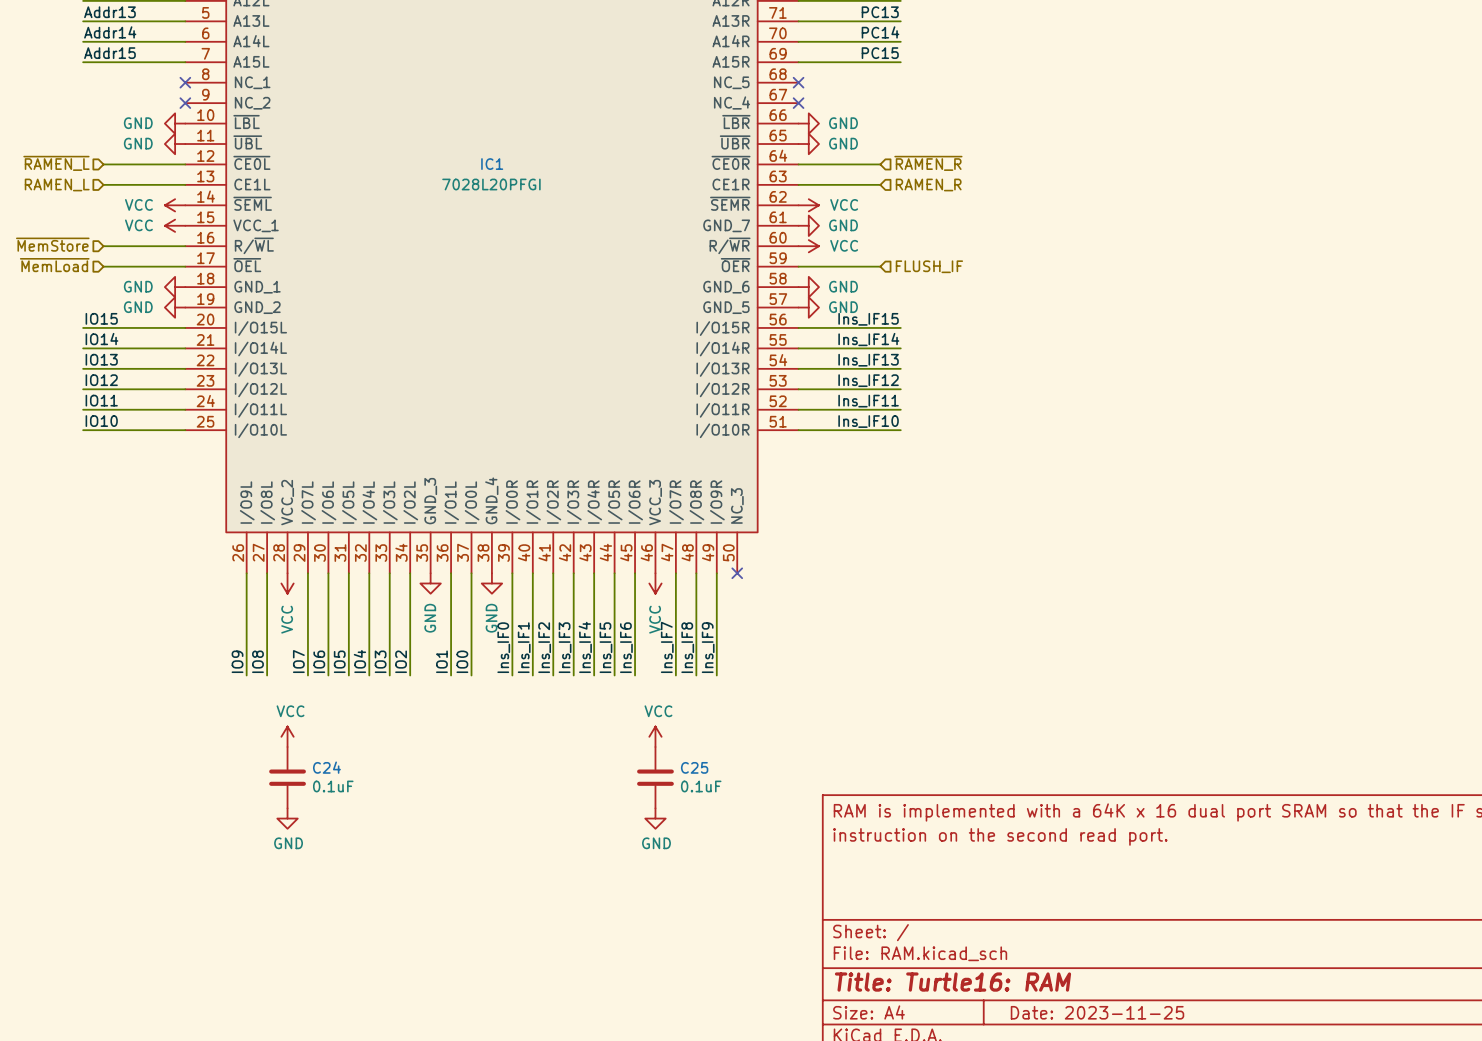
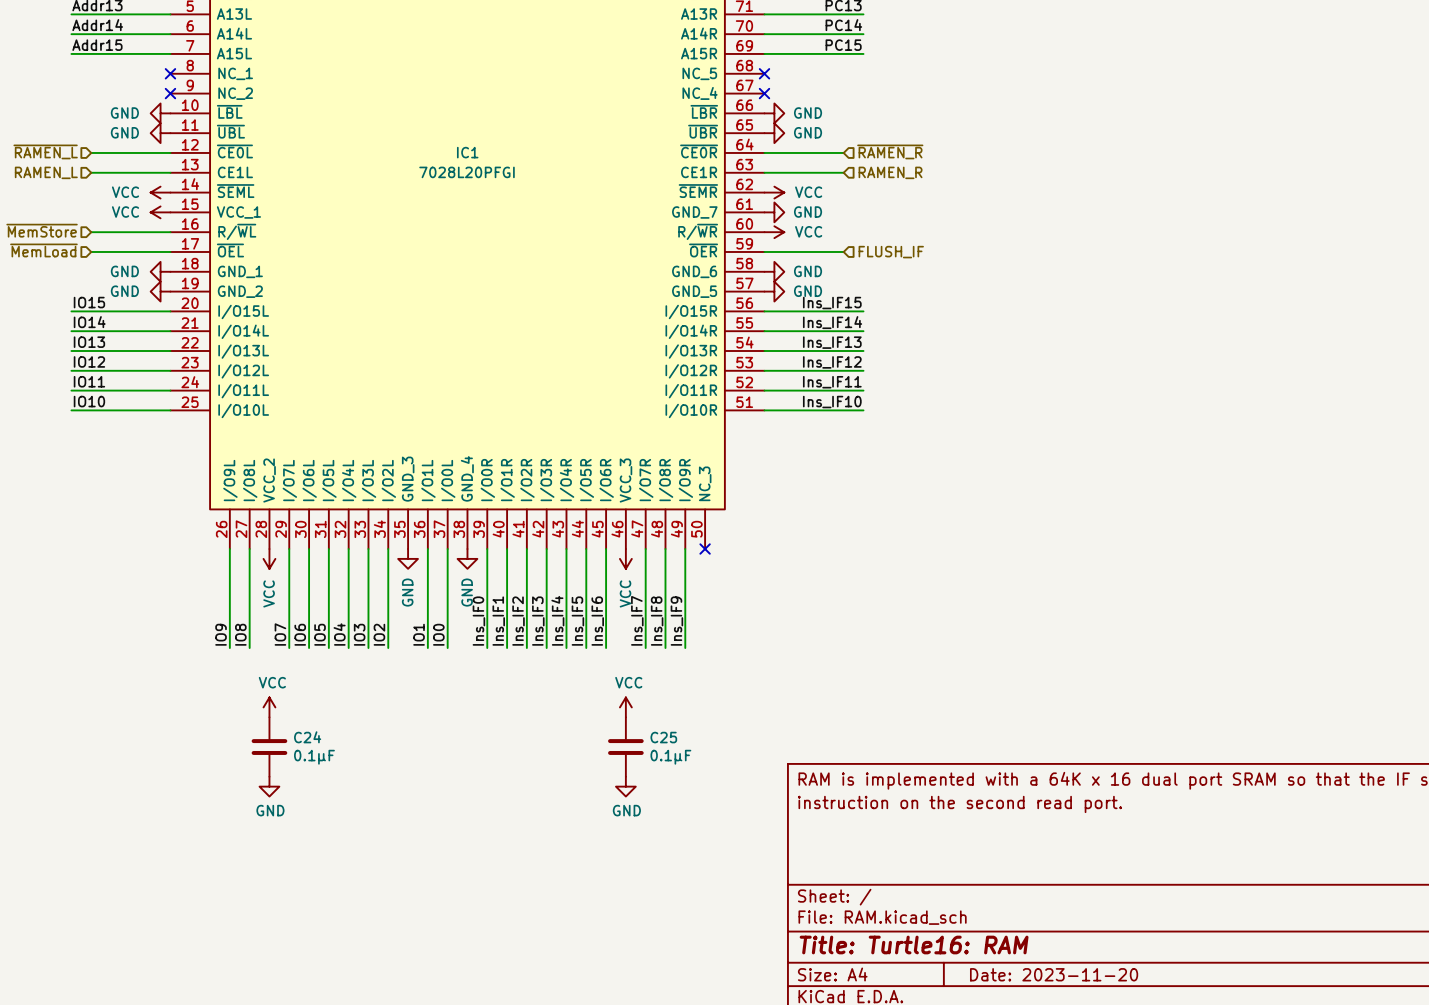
C24 value: 0.1uF (333, 786) -> 0.1μF (314, 757)
C25 value: 0.1uF (701, 786) -> 0.1μF (670, 757)
title block: Date: 2023-11-25 (1097, 1012) -> Date: 2023-11-20 (1054, 974)

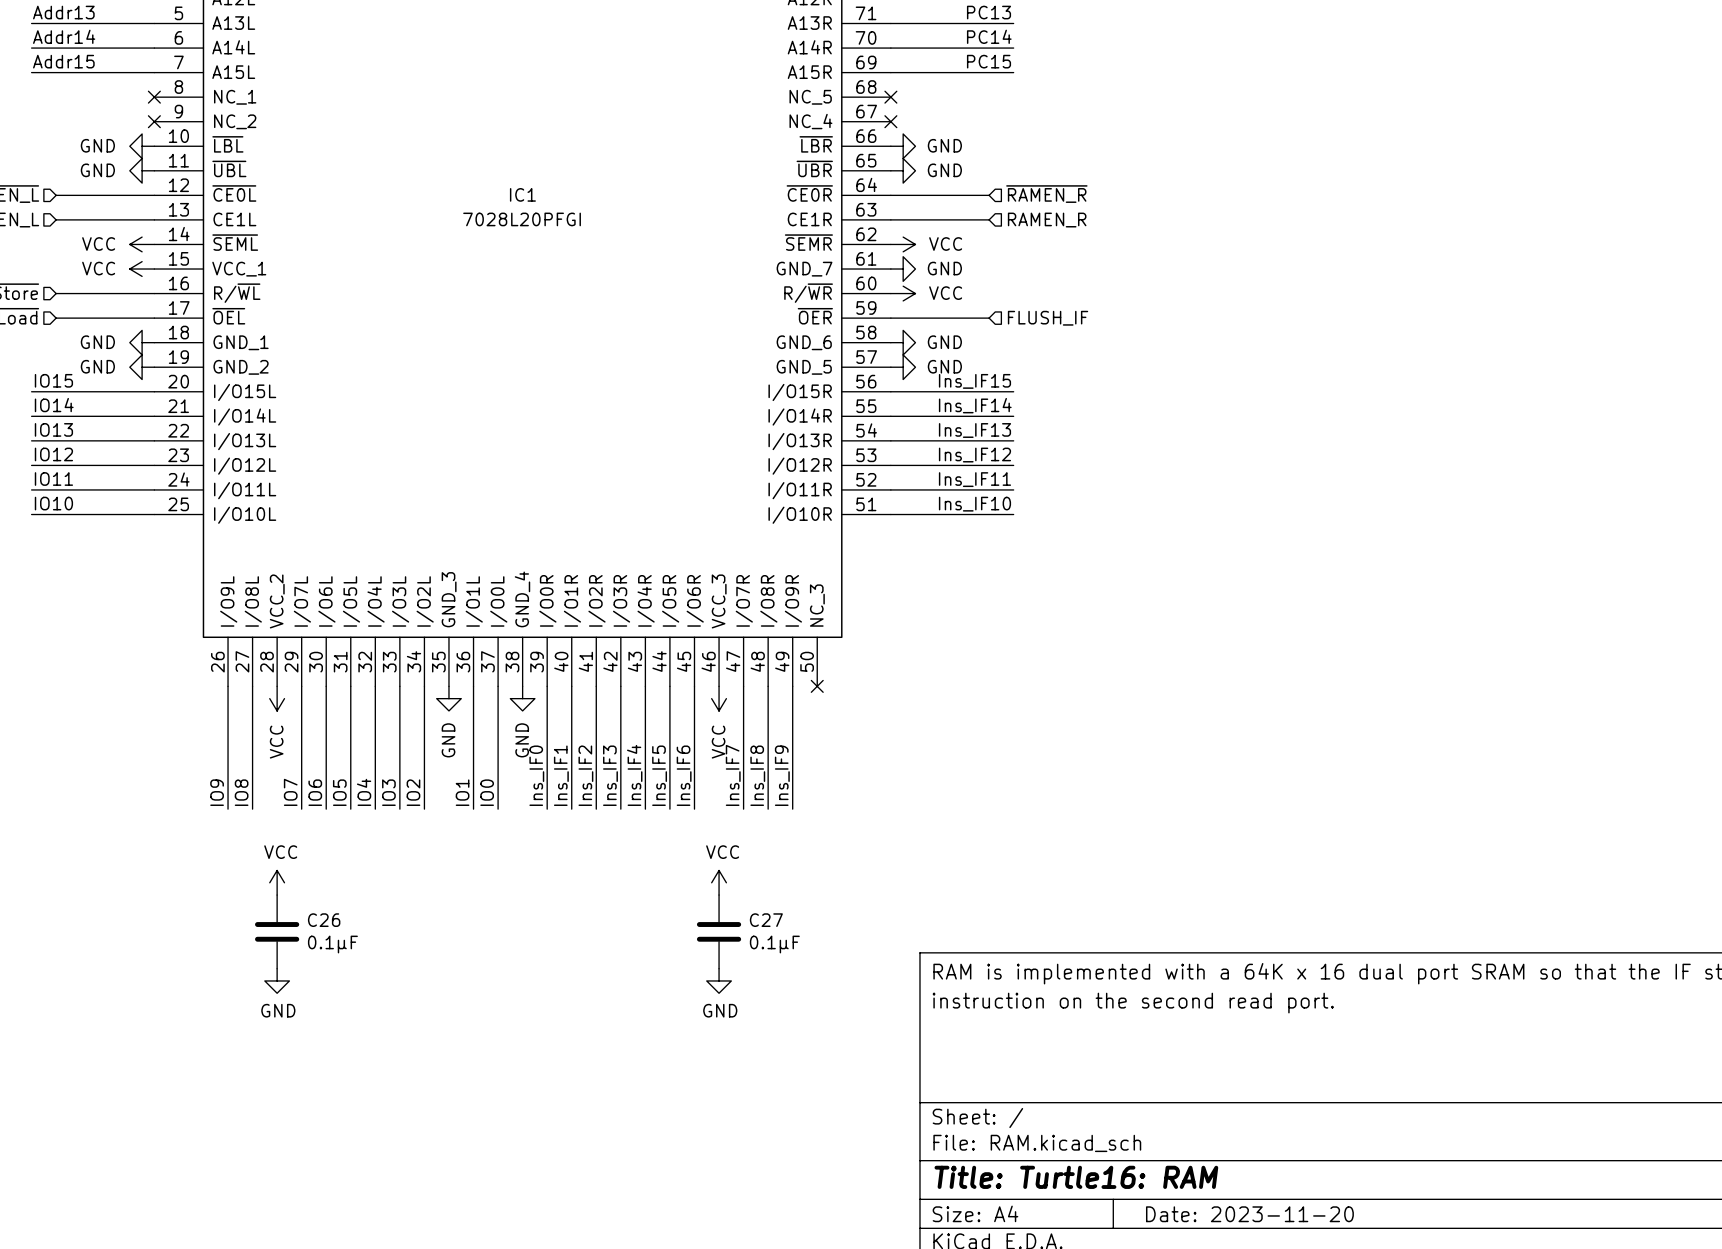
C24 name: C24 (307, 737) -> C26 (324, 920)
C25 name: C25 (663, 737) -> C27 (766, 920)

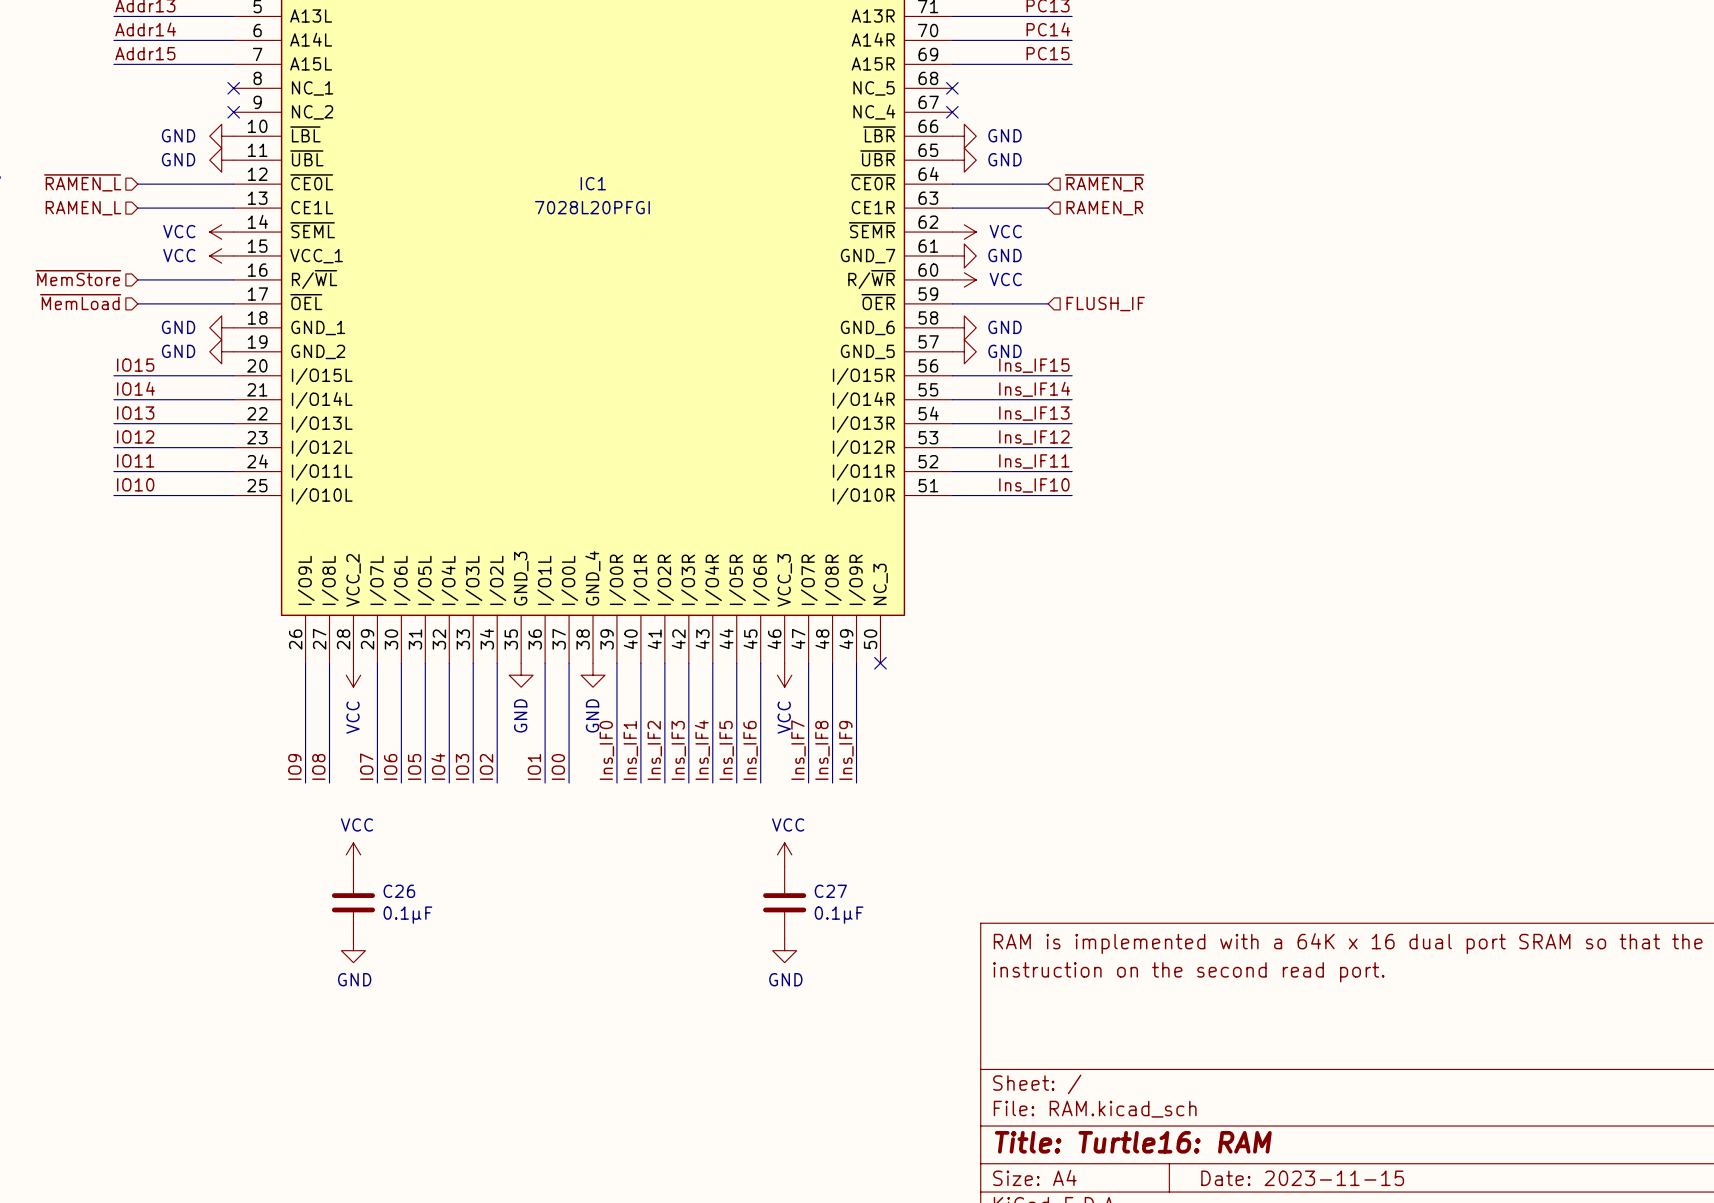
title block: Date: 2023-11-20 (1249, 1214) -> Date: 2023-11-15 (1302, 1178)

